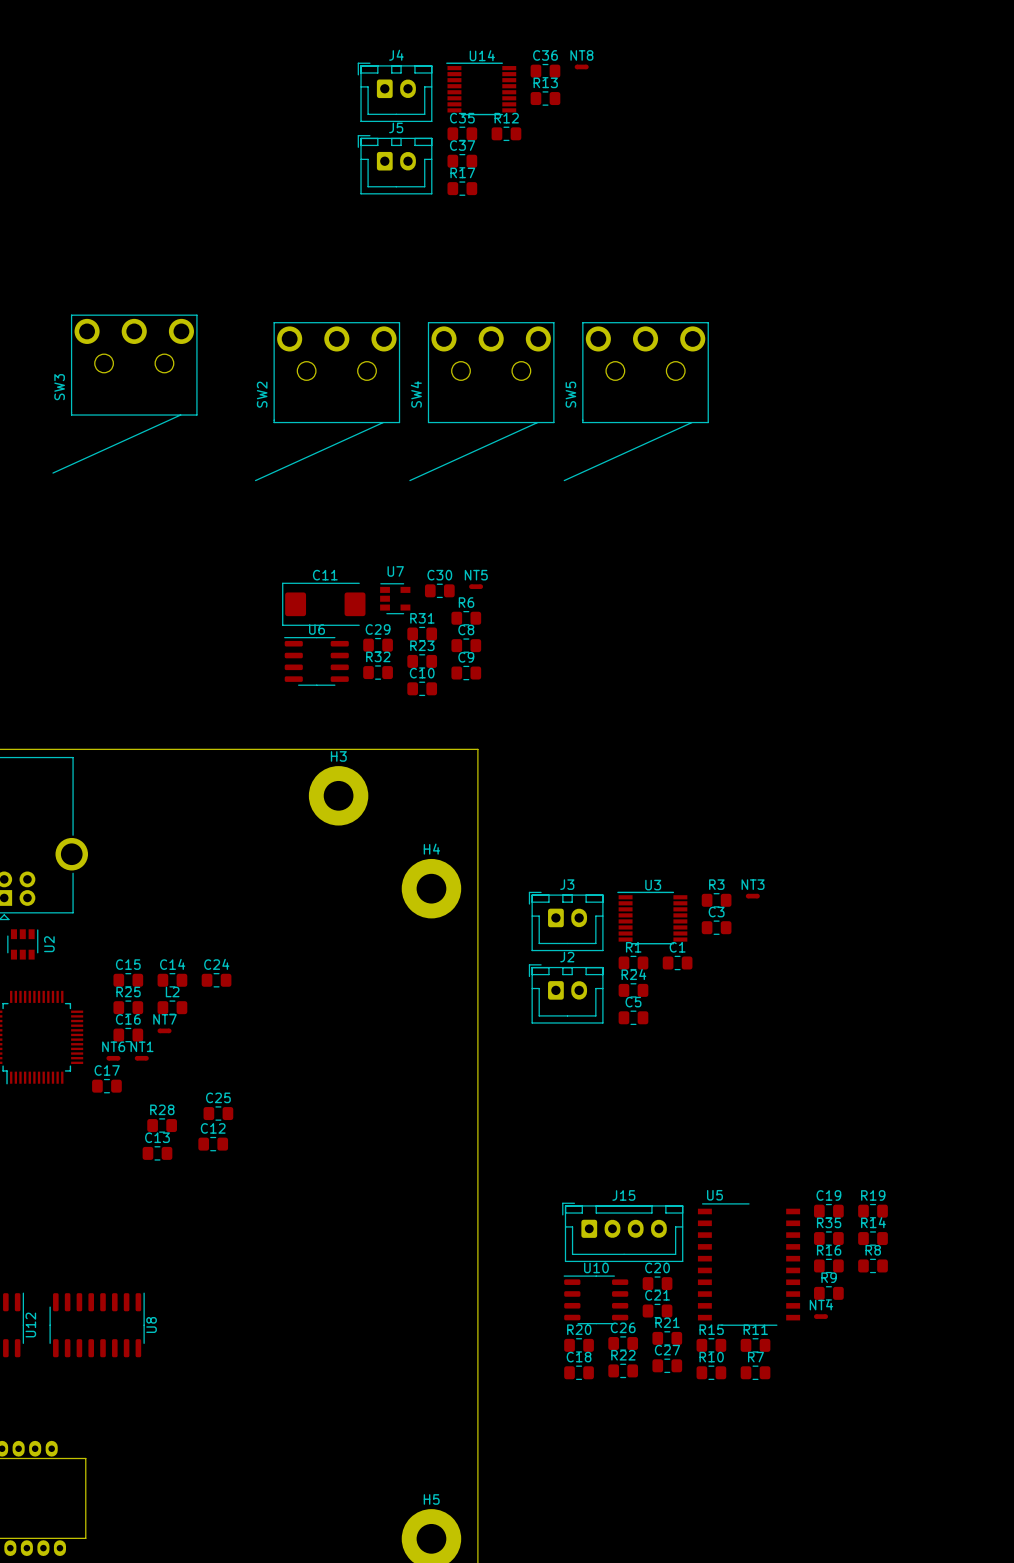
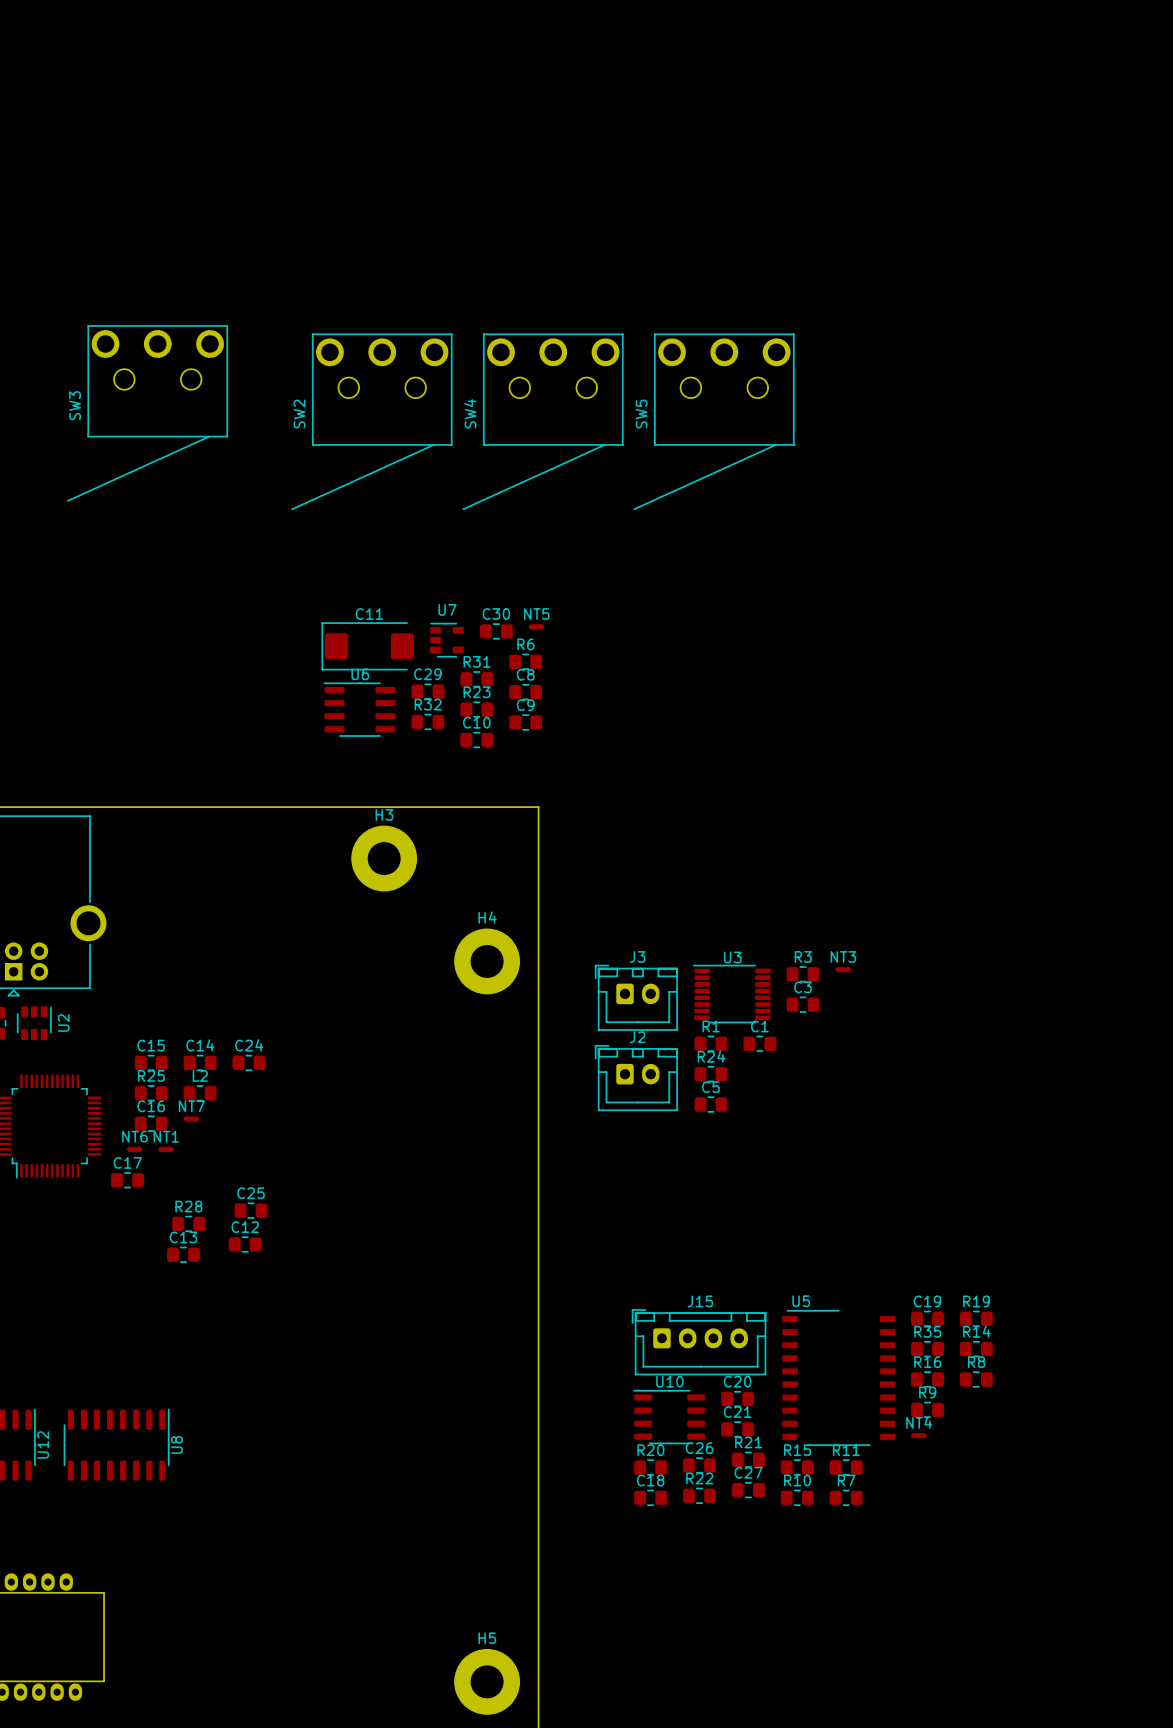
NT8: (581, 66) -> none
C36: (545, 71) -> none
U14: (481, 88) -> none
J4: (395, 92) -> none
R13: (545, 98) -> none
C35: (462, 133) -> none
R12: (506, 133) -> none
C37: (462, 161) -> none
J5: (395, 164) -> none
R17: (462, 188) -> none

